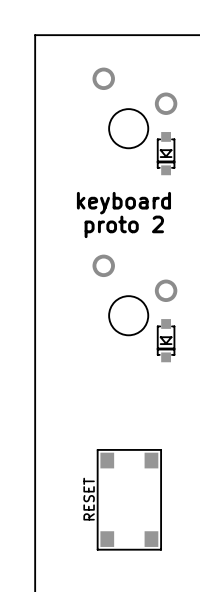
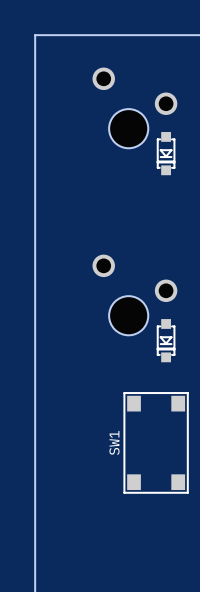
text: keyboard (123, 203) -> none
text: proto 2 (124, 226) -> none
part: none -> (156, 442)
RESET: (129, 499) -> none

